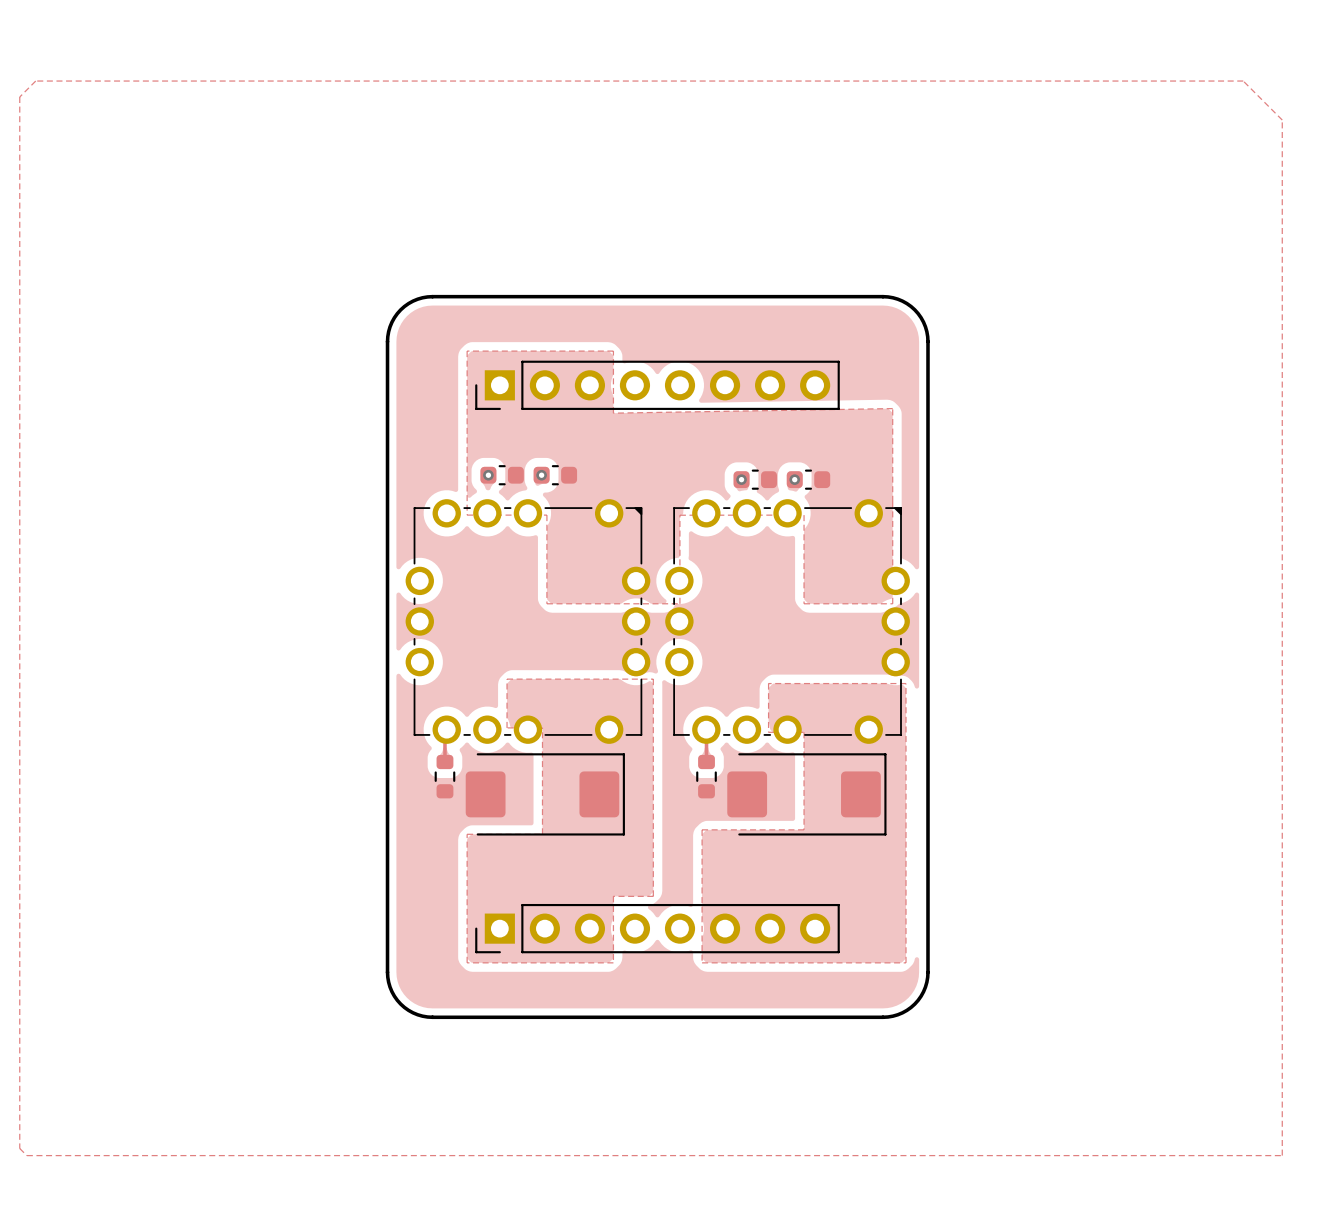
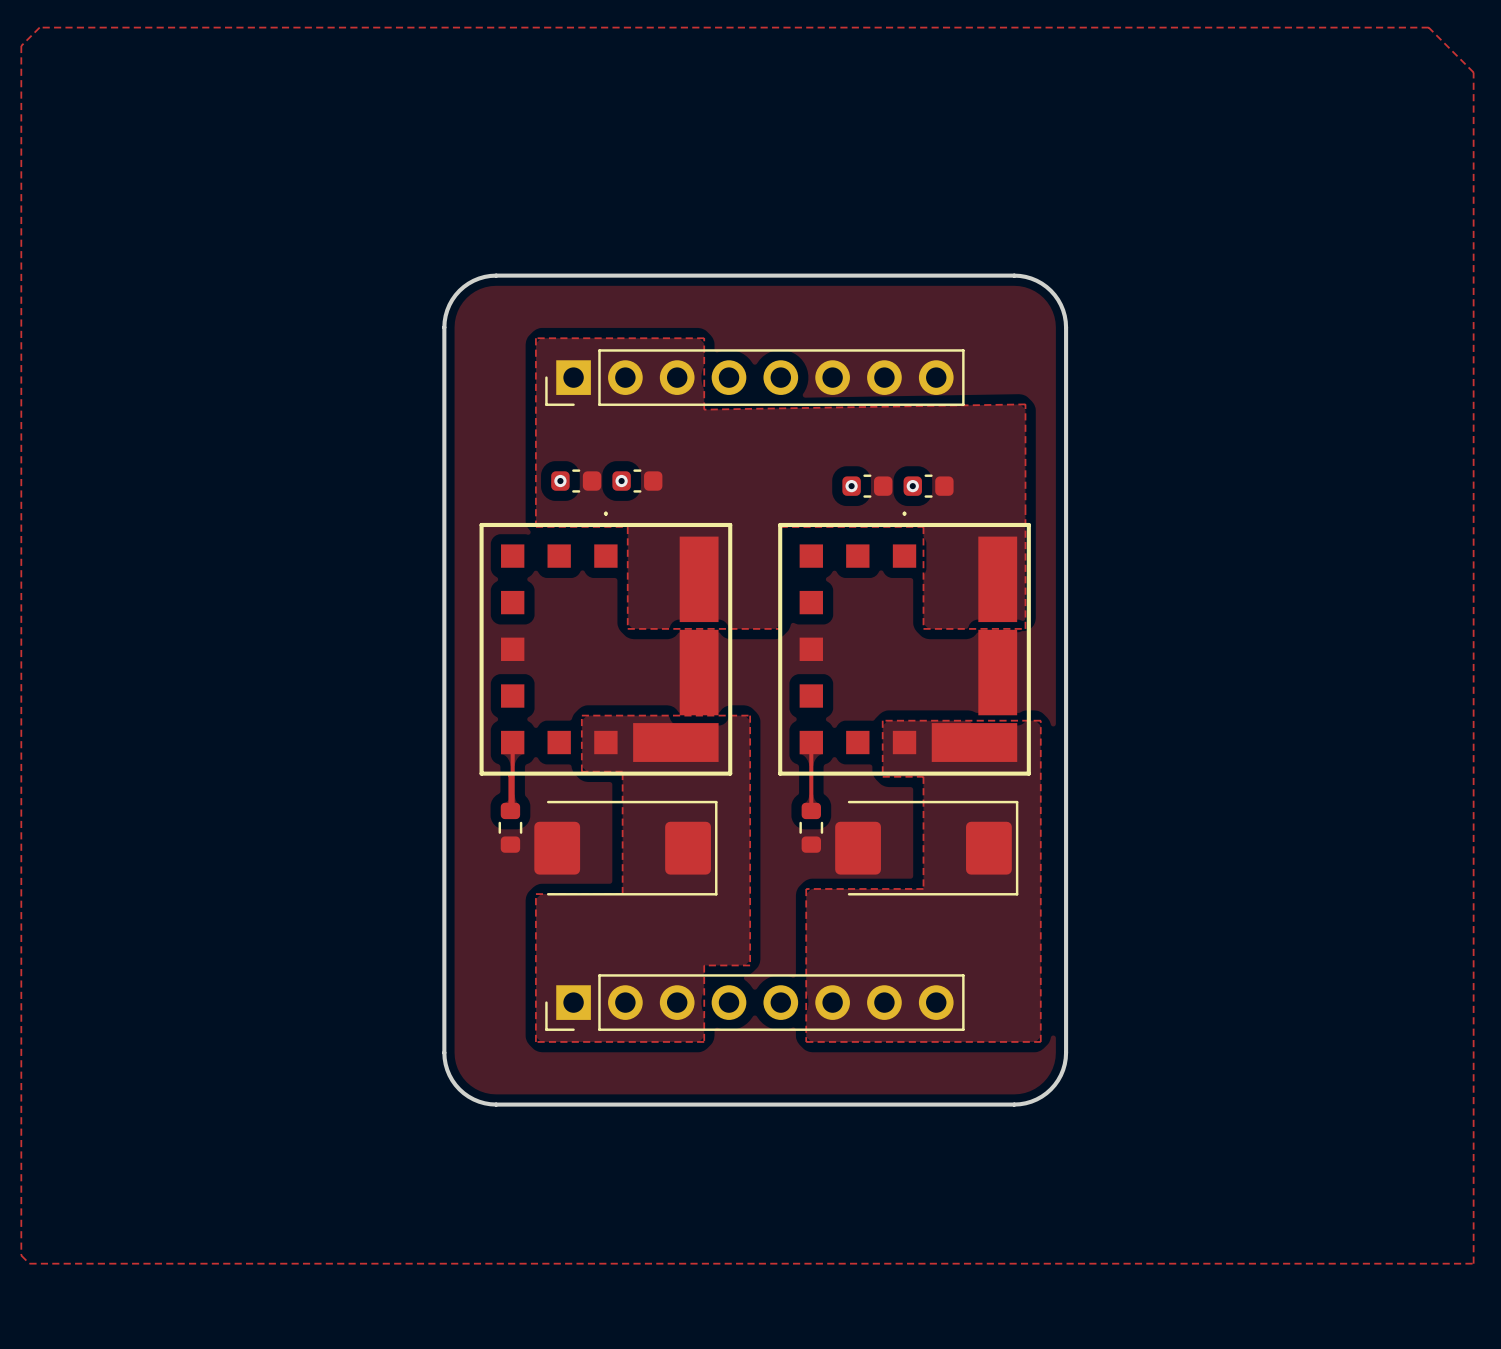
part footprint: [405, 499, 651, 744] -> [479, 511, 733, 776]
part footprint: [665, 499, 910, 744] -> [778, 511, 1031, 776]
track: none -> (512, 742) (512, 808)
track: none -> (811, 742) (811, 773)

